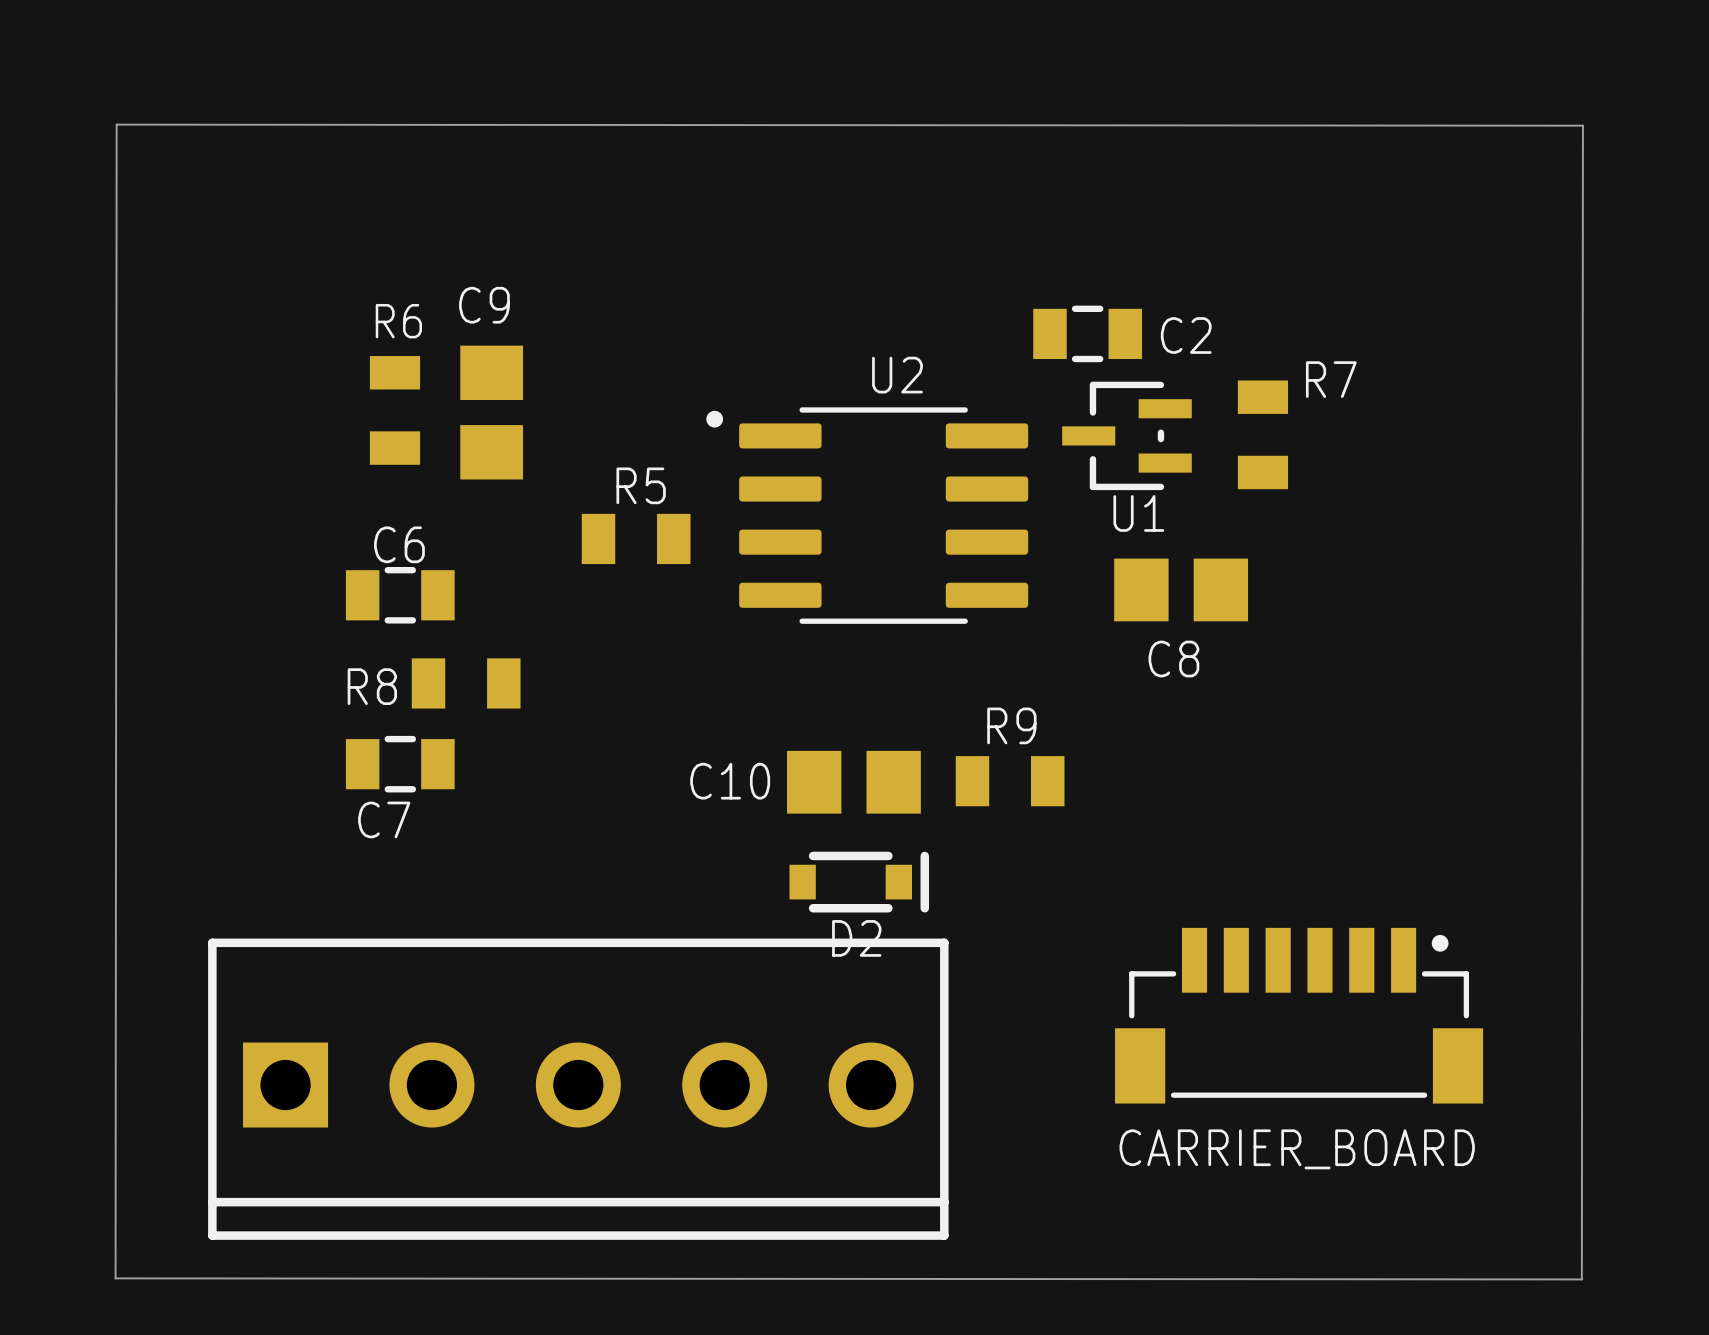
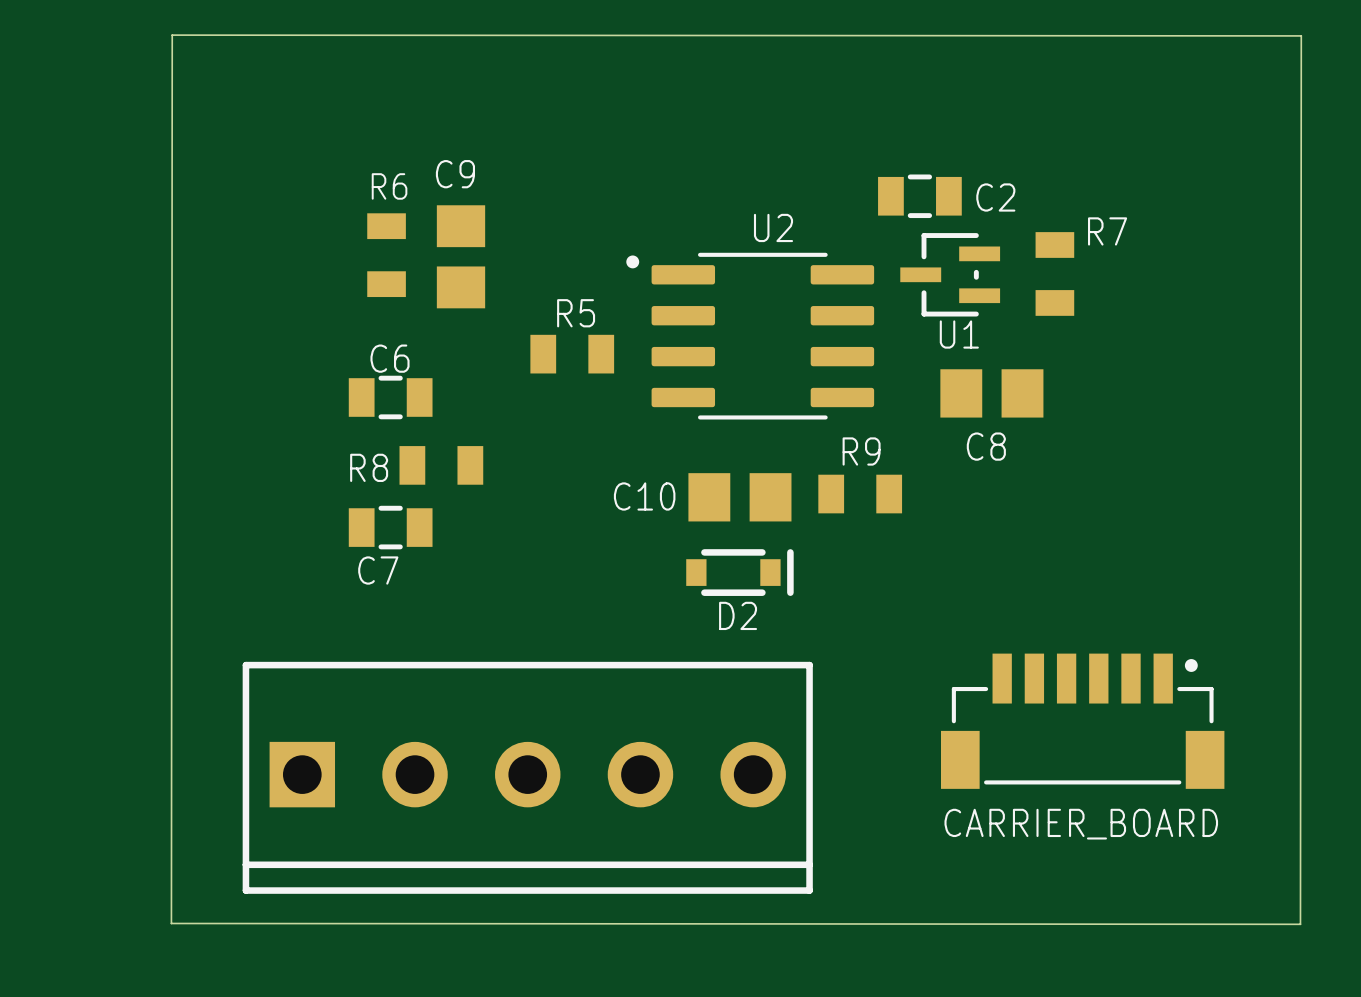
R9 position: (1010, 781) -> (860, 494)
C10 position: (853, 782) -> (739, 497)
D2 position: (859, 882) -> (739, 572)

